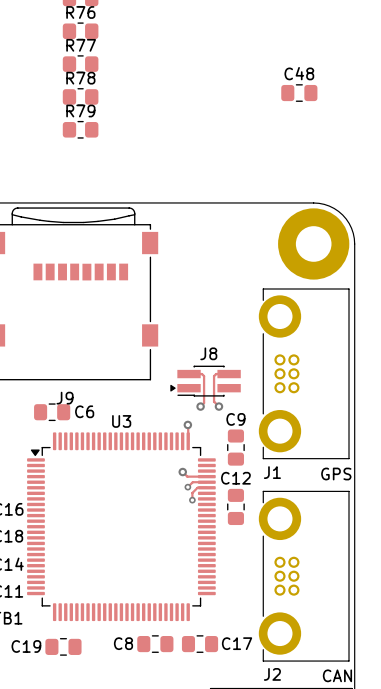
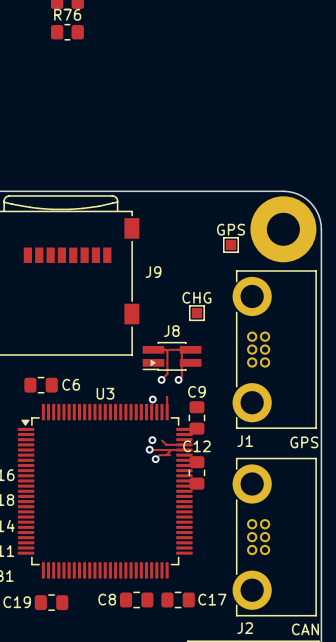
R77: (80, 64) -> none
C48: (299, 93) -> none
R78: (80, 96) -> none
R79: (80, 129) -> none
GPS: none -> (231, 245)
CHG: none -> (196, 313)
track: none -> (153, 349) (165, 349) (167, 351) (167, 374) (161, 379)
track: (229, 374) (216, 374) (214, 376) (214, 401) (218, 406) -> none
J8 position: (209, 381) -> (172, 356)
J9 name position: J9 (65, 398) -> J9 (153, 272)
via: none -> (161, 379)
via: (218, 406) -> none
via: (187, 424) -> none
via: none -> (152, 399)
C9 position: (235, 447) -> (196, 417)
via: none -> (152, 440)
via: (182, 472) -> none
track: none -> (149, 449) (170, 450)
via: none -> (149, 449)
via: (187, 487) -> none
track: none -> (170, 455) (159, 455) (155, 459)
track: (206, 487) (197, 487) (192, 492) (192, 500) -> none
via: none -> (155, 459)
via: (192, 500) -> none
C12 position: (235, 506) -> (196, 472)

